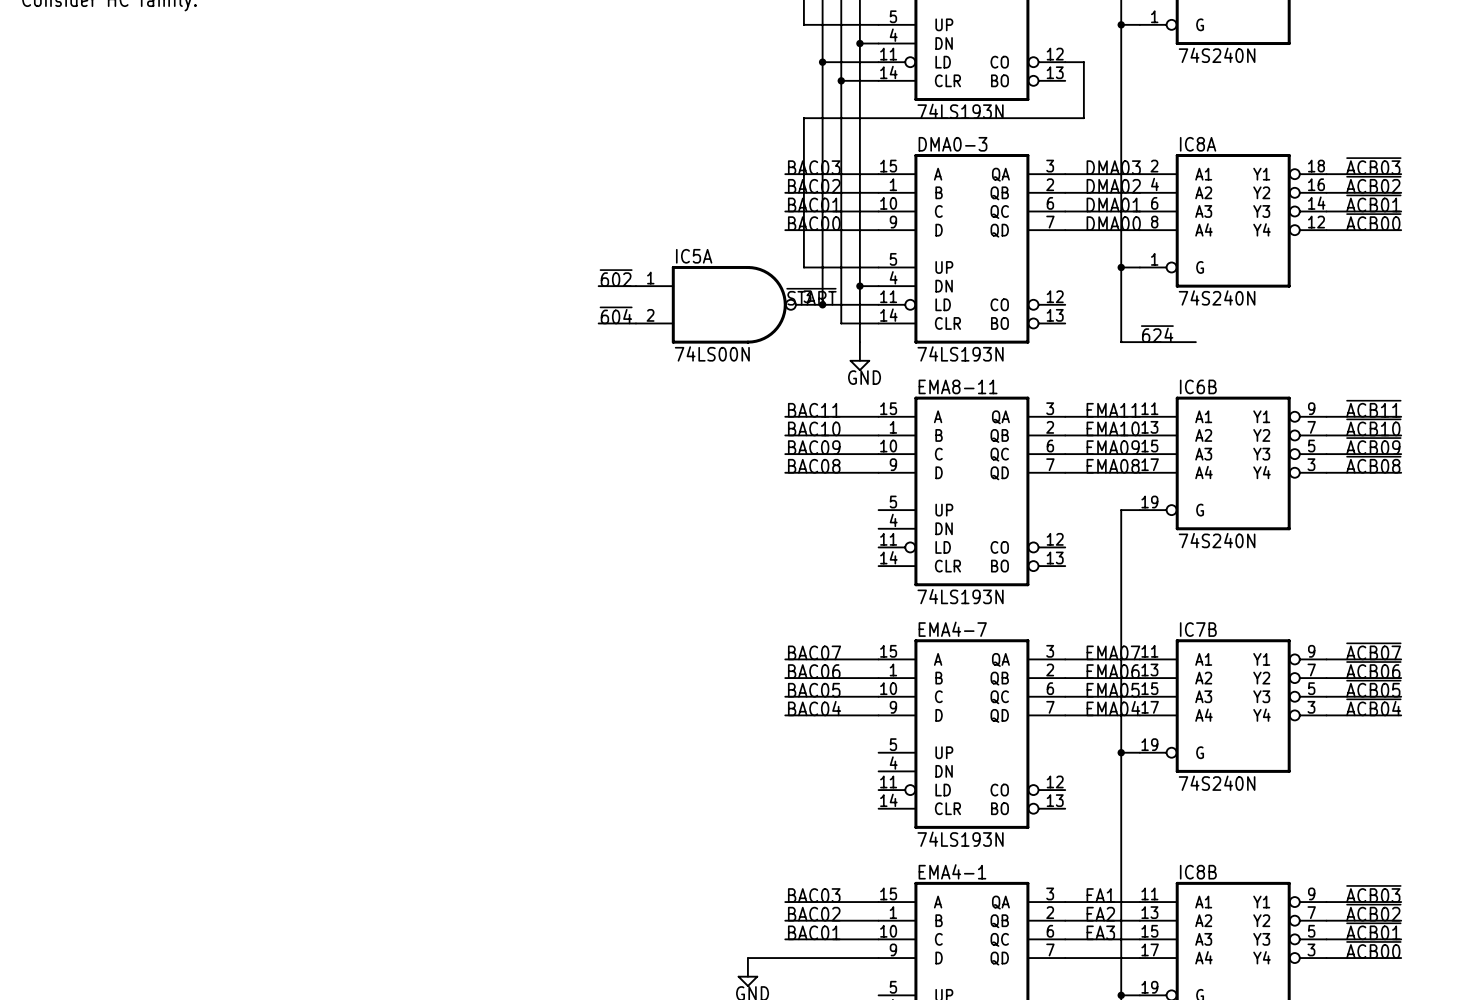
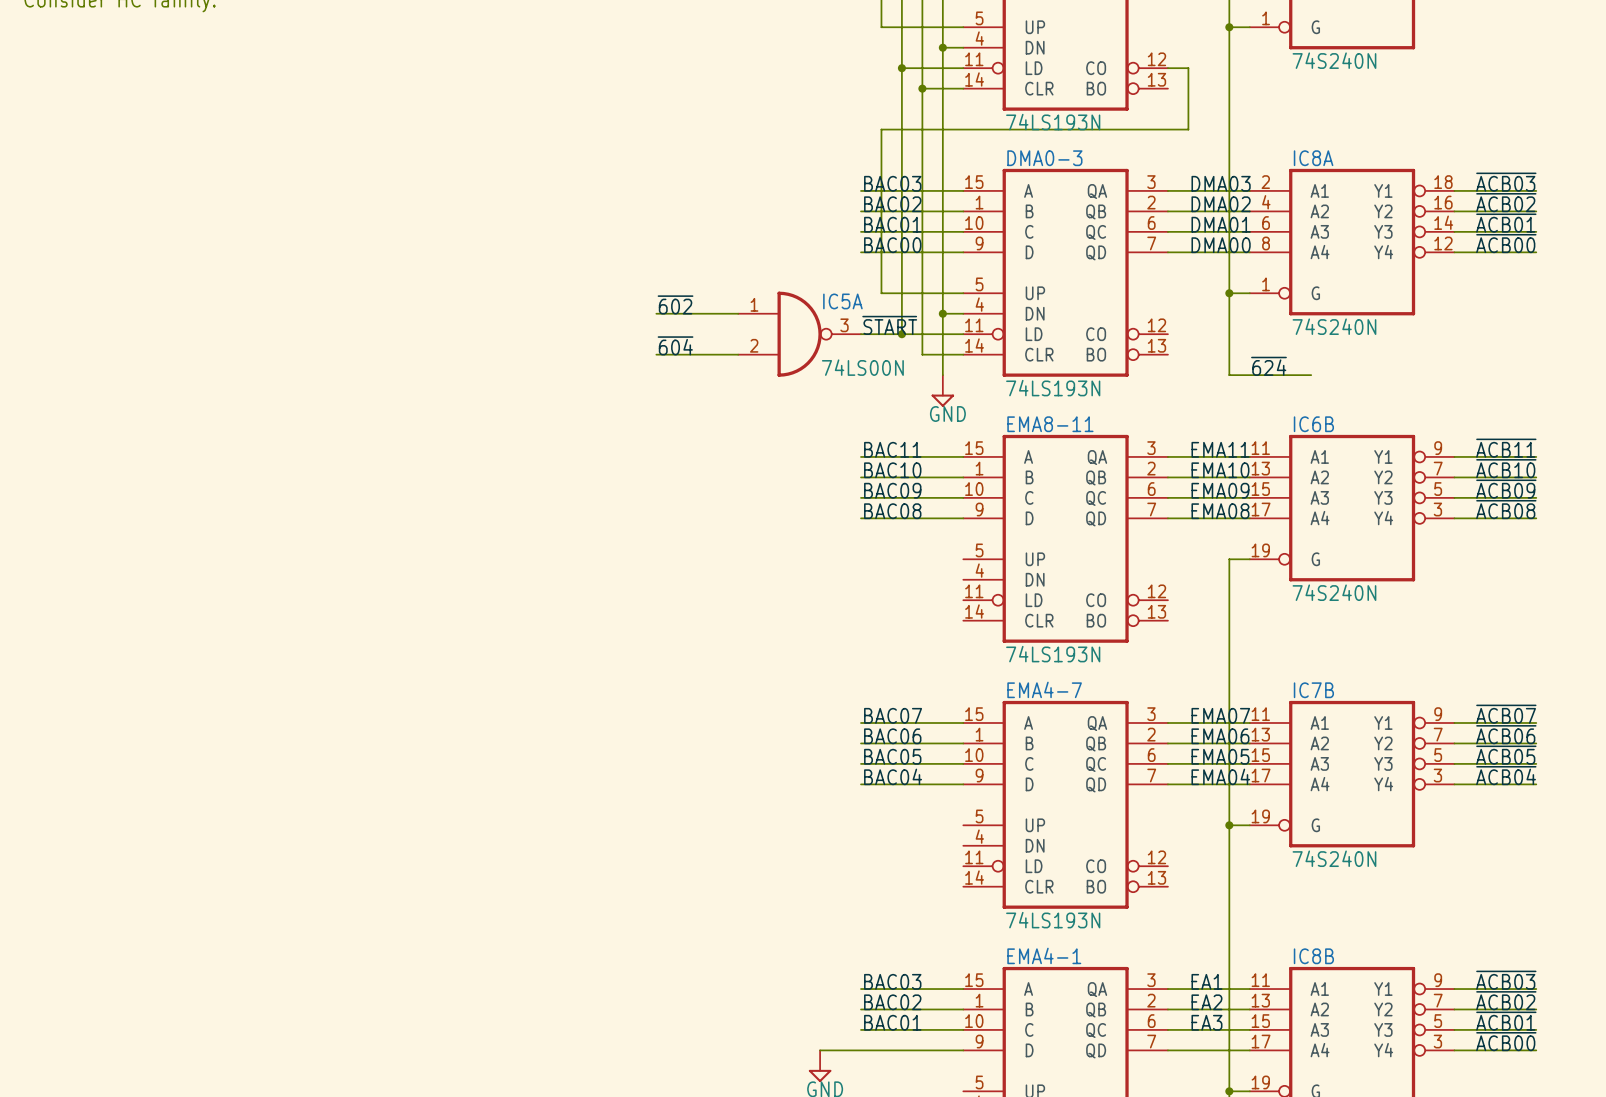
IC5A name position: IC5A (694, 256) -> IC5A (842, 301)
IC5A symbol: [635, 265, 823, 344] -> [738, 291, 862, 377]
IC5A value position: 74LS00N (712, 353) -> 74LS00N (862, 367)

